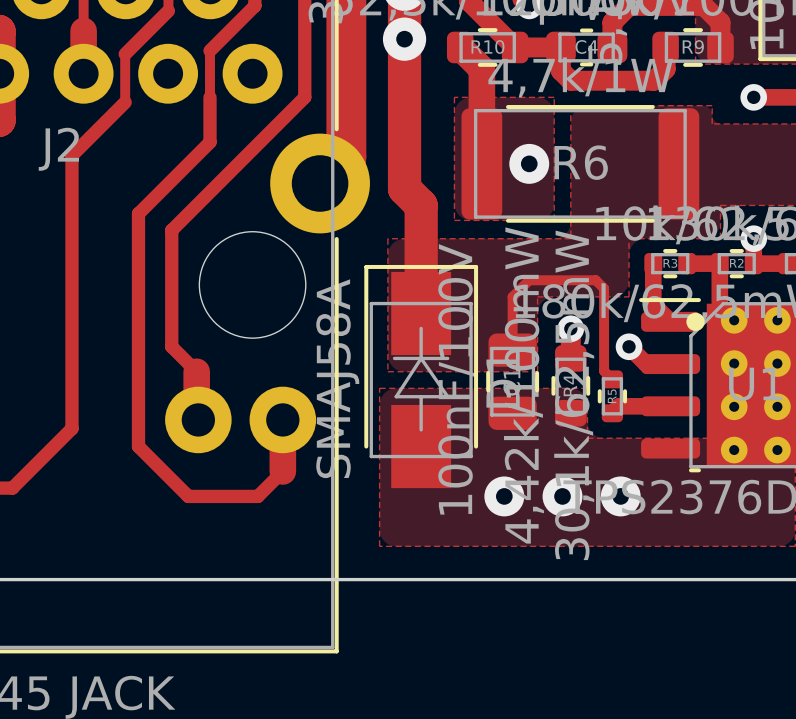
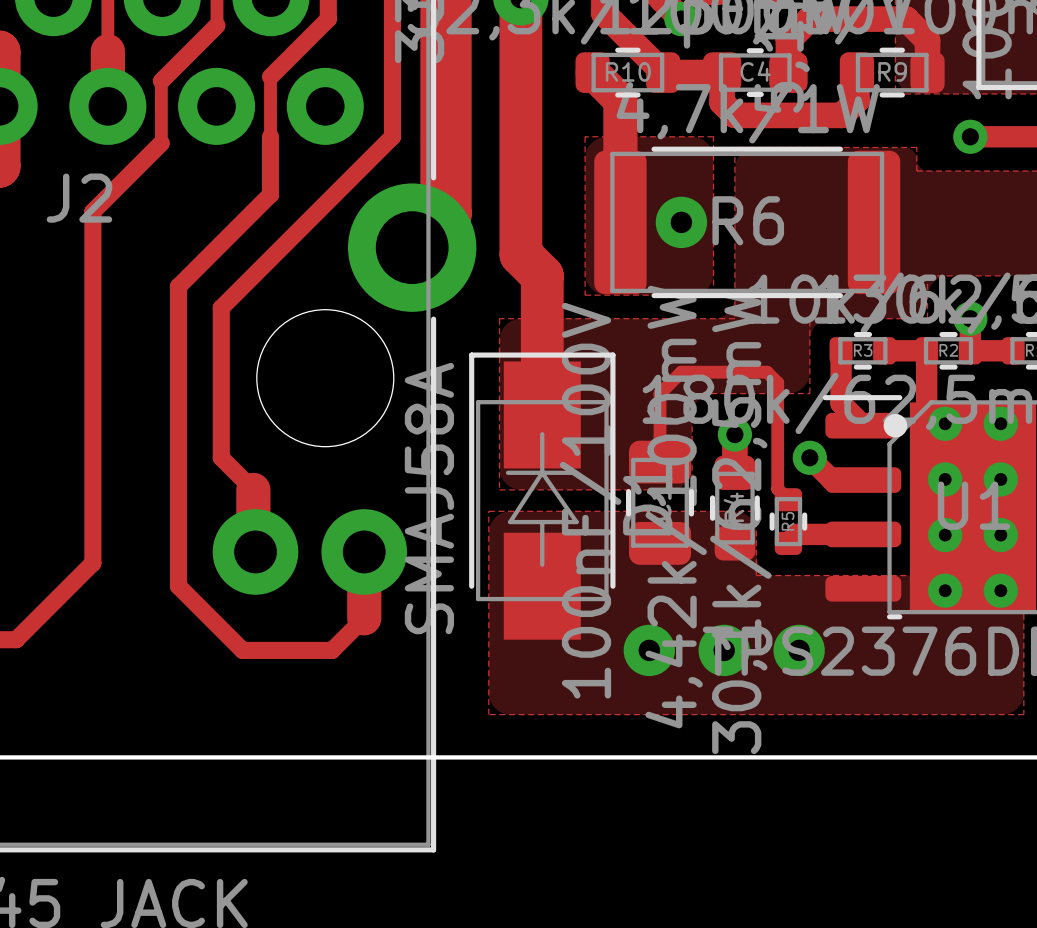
via: (404, 39) -> none

